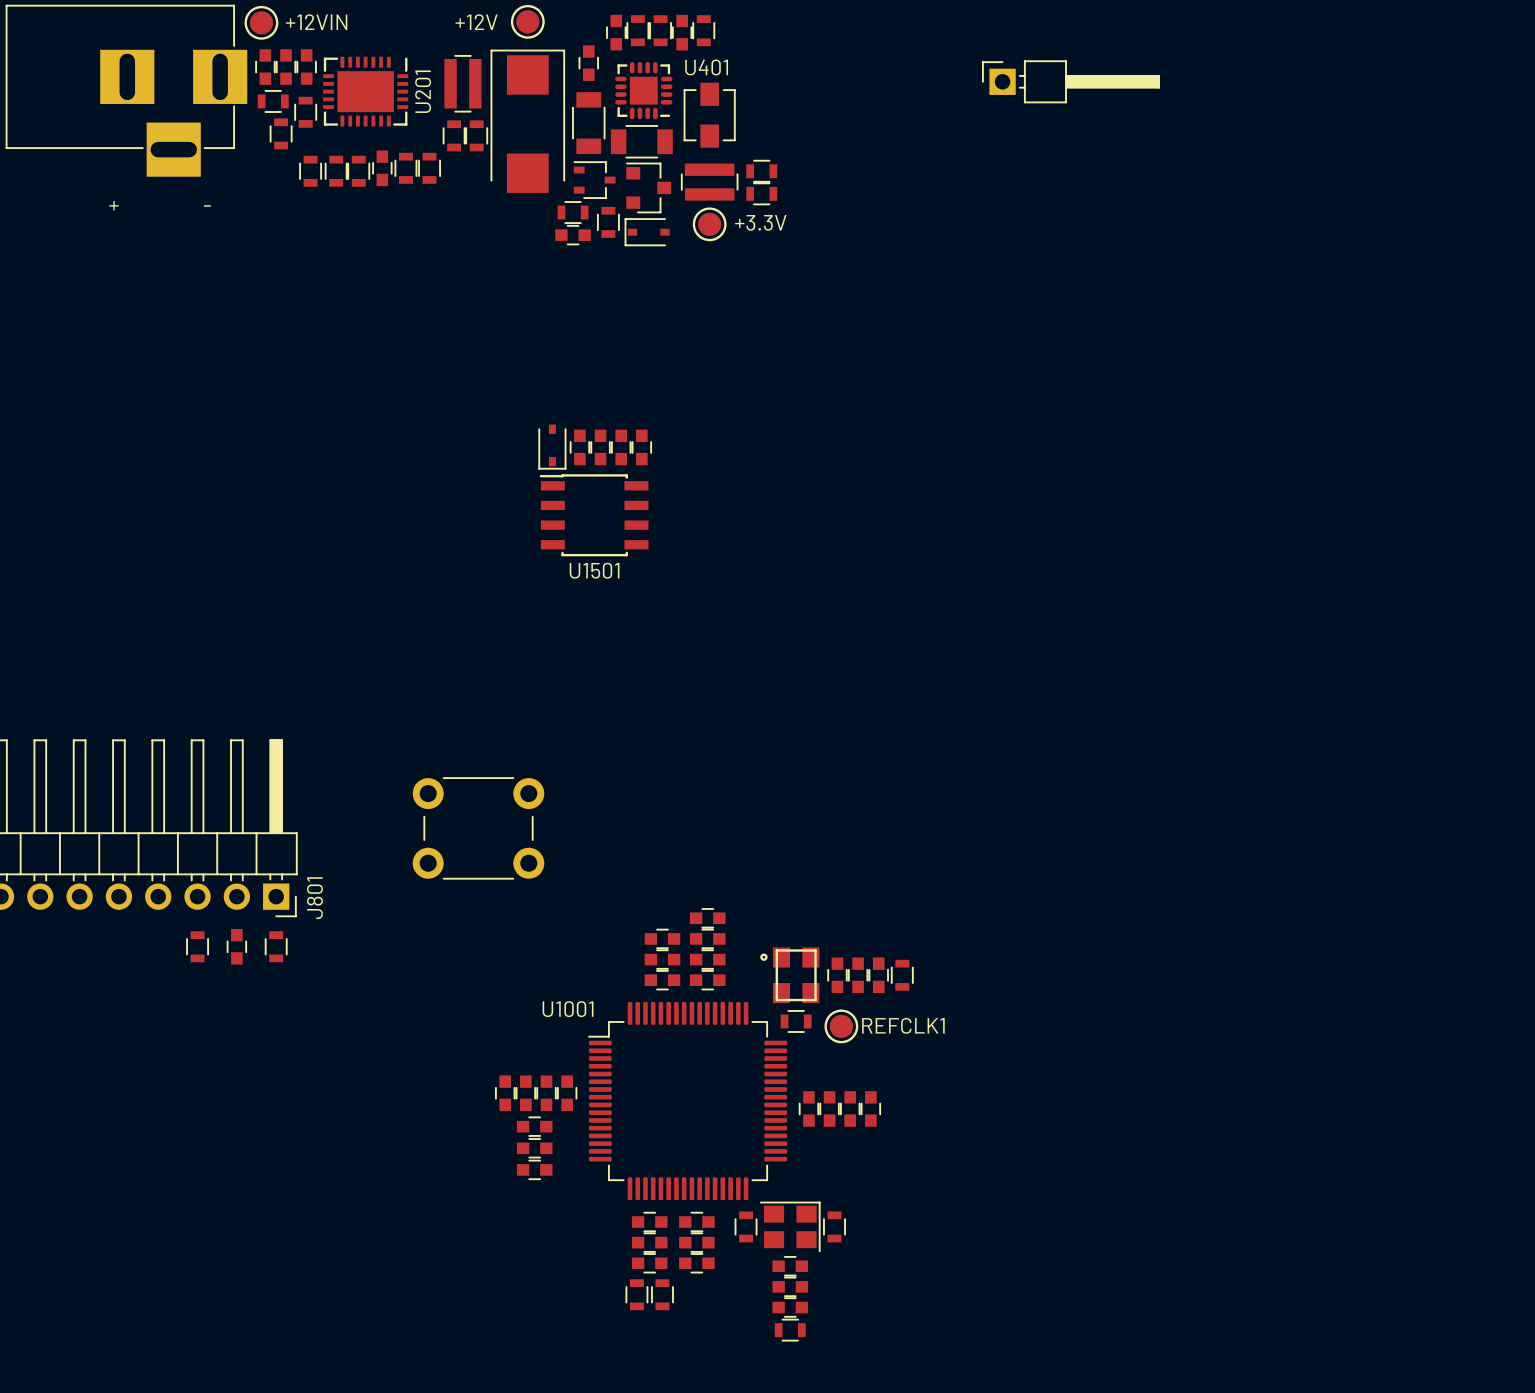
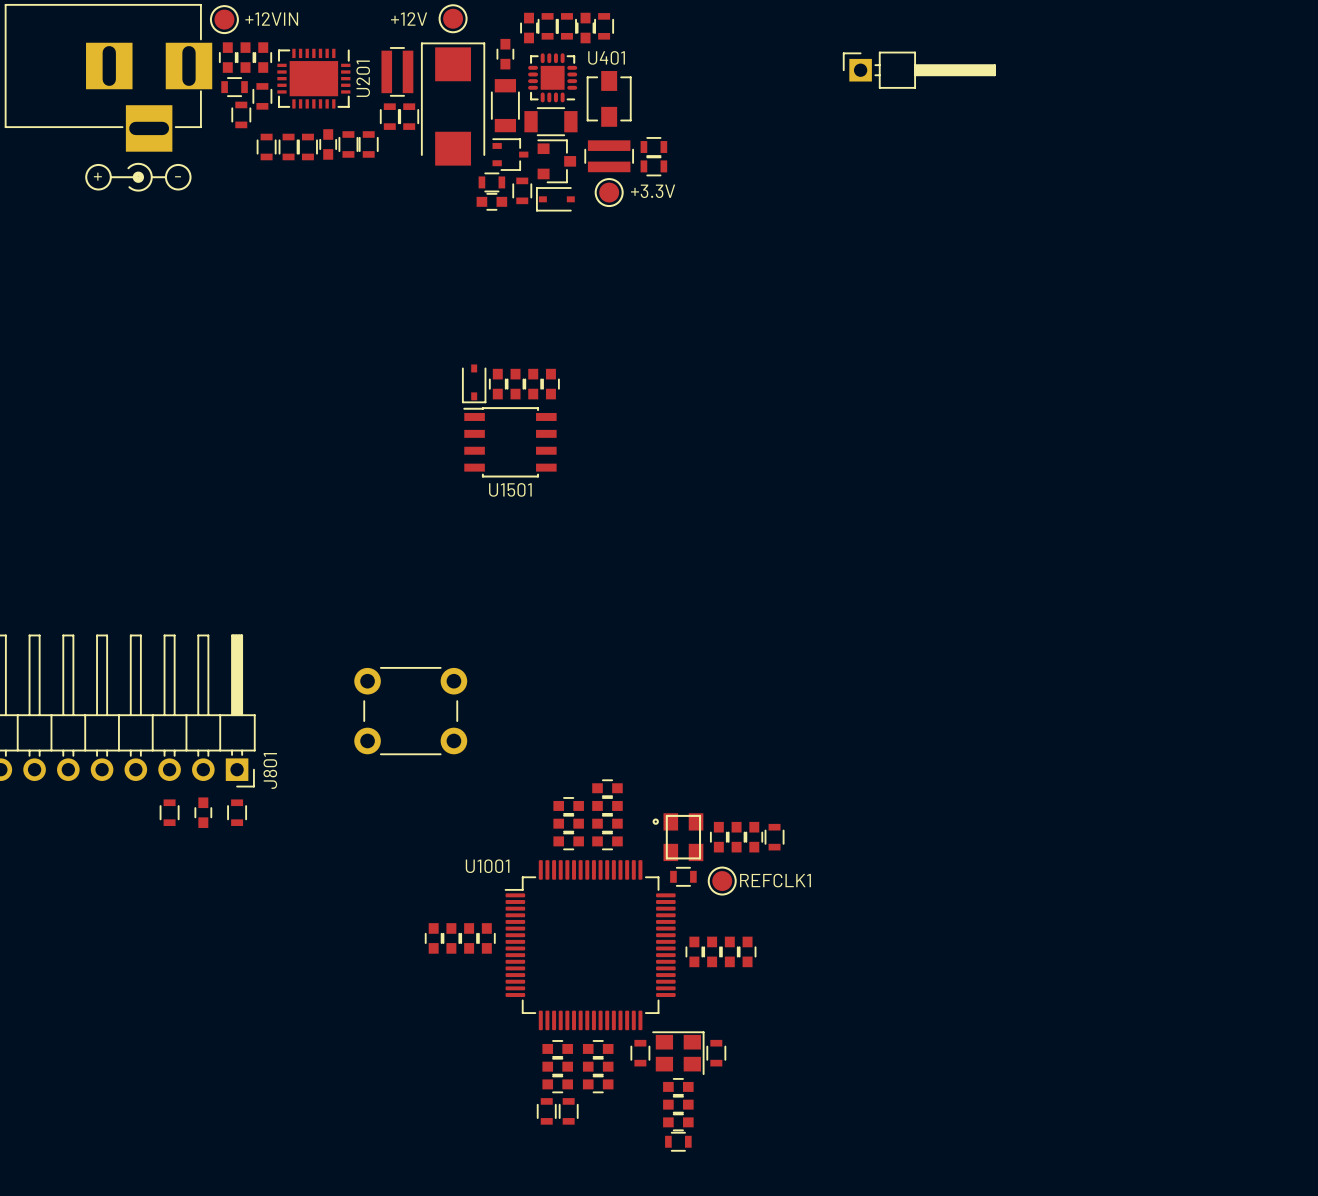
drawing: none -> [85, 162, 192, 192]
part: (534, 1126) -> none
part: (534, 1148) -> none
part: (534, 1169) -> none

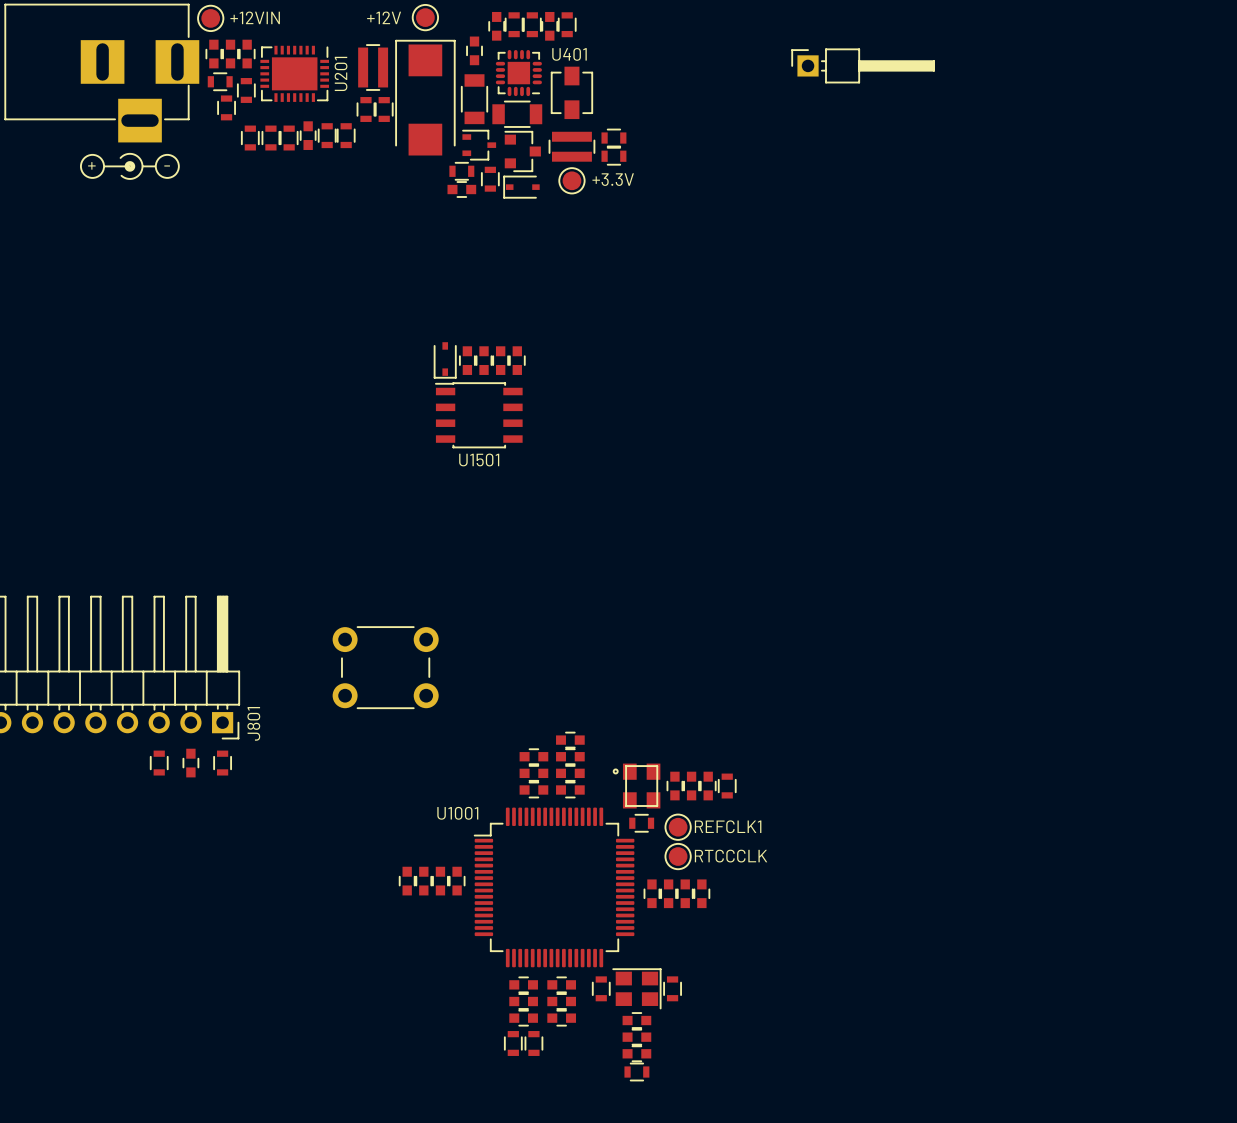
text: none -> RTCCCLK (731, 856)
part: none -> (678, 856)

